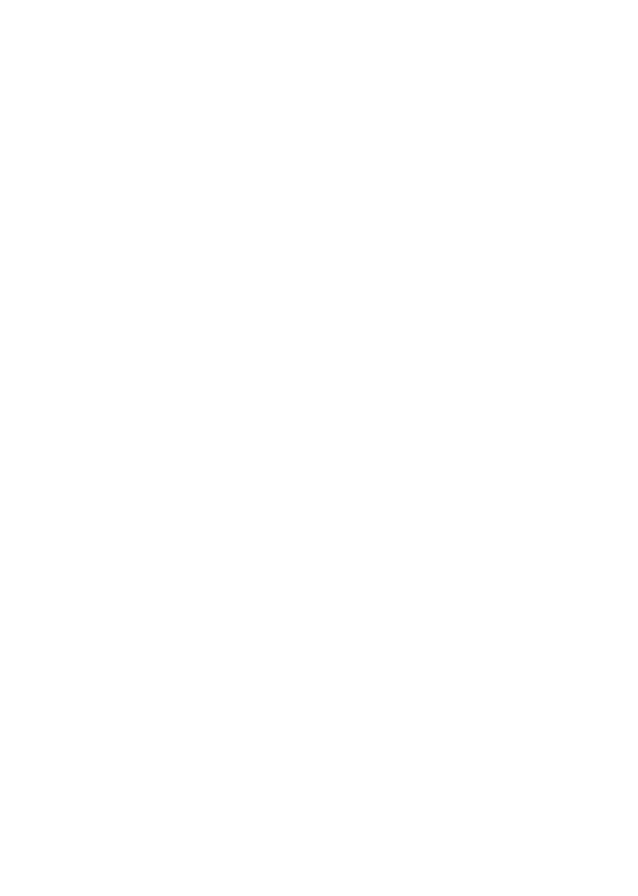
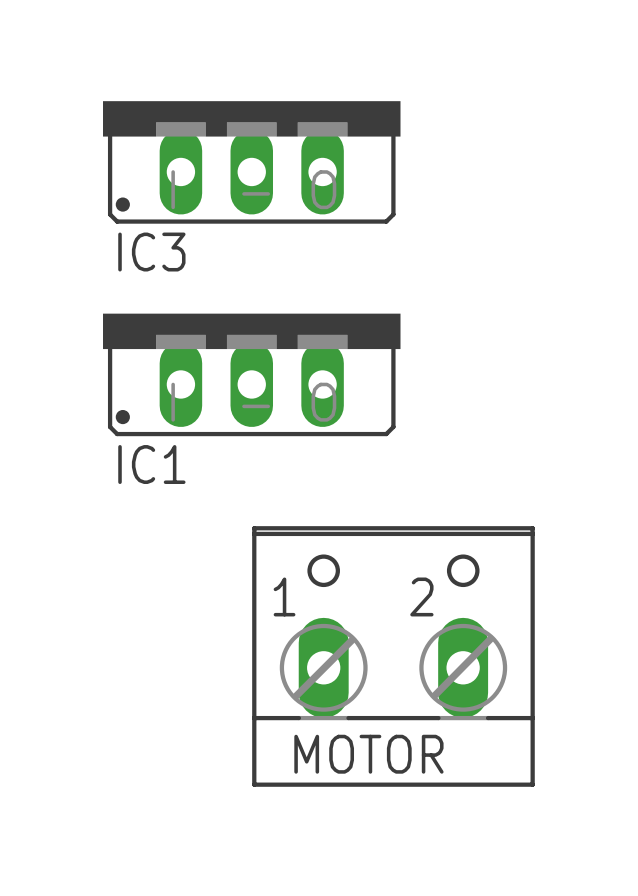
IC3: none -> (251, 162)
IC1: none -> (251, 374)
MOTOR: none -> (393, 656)

